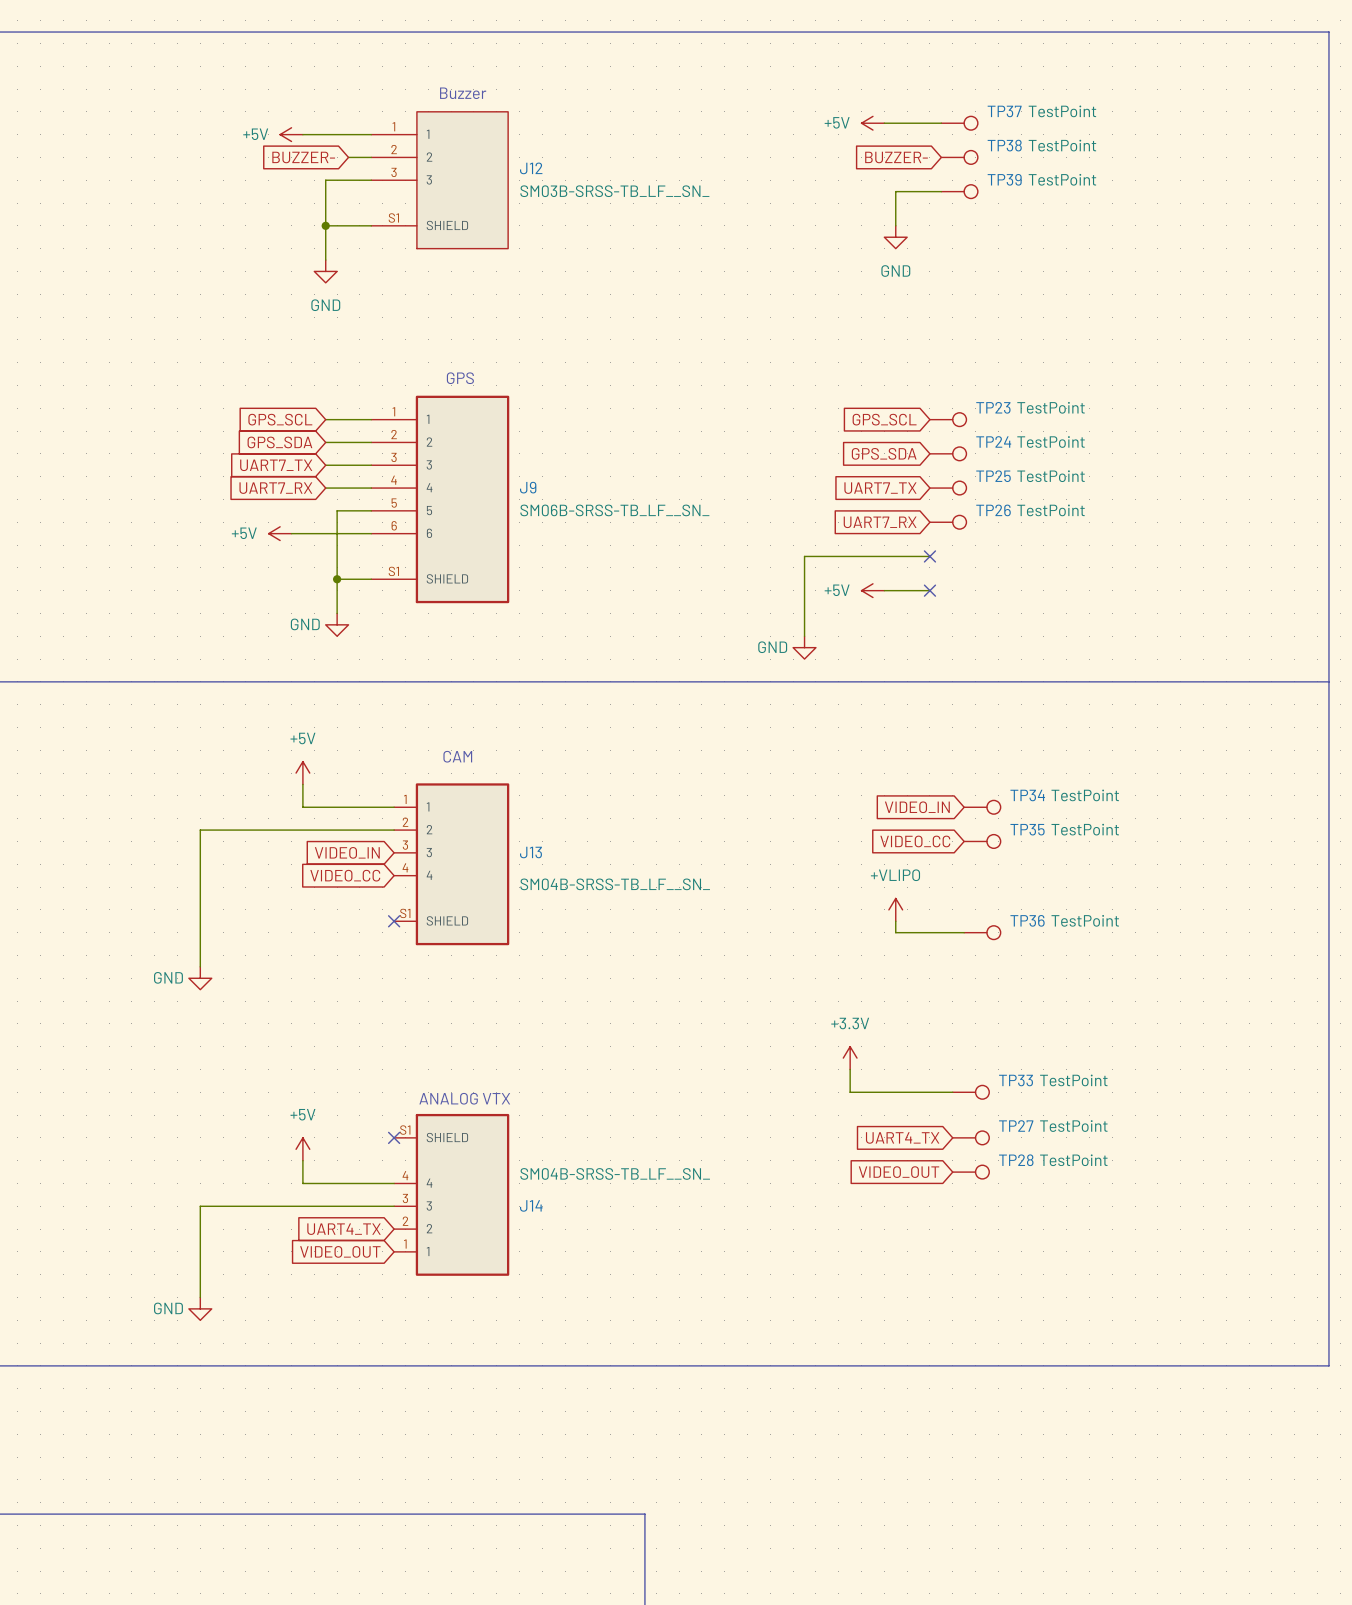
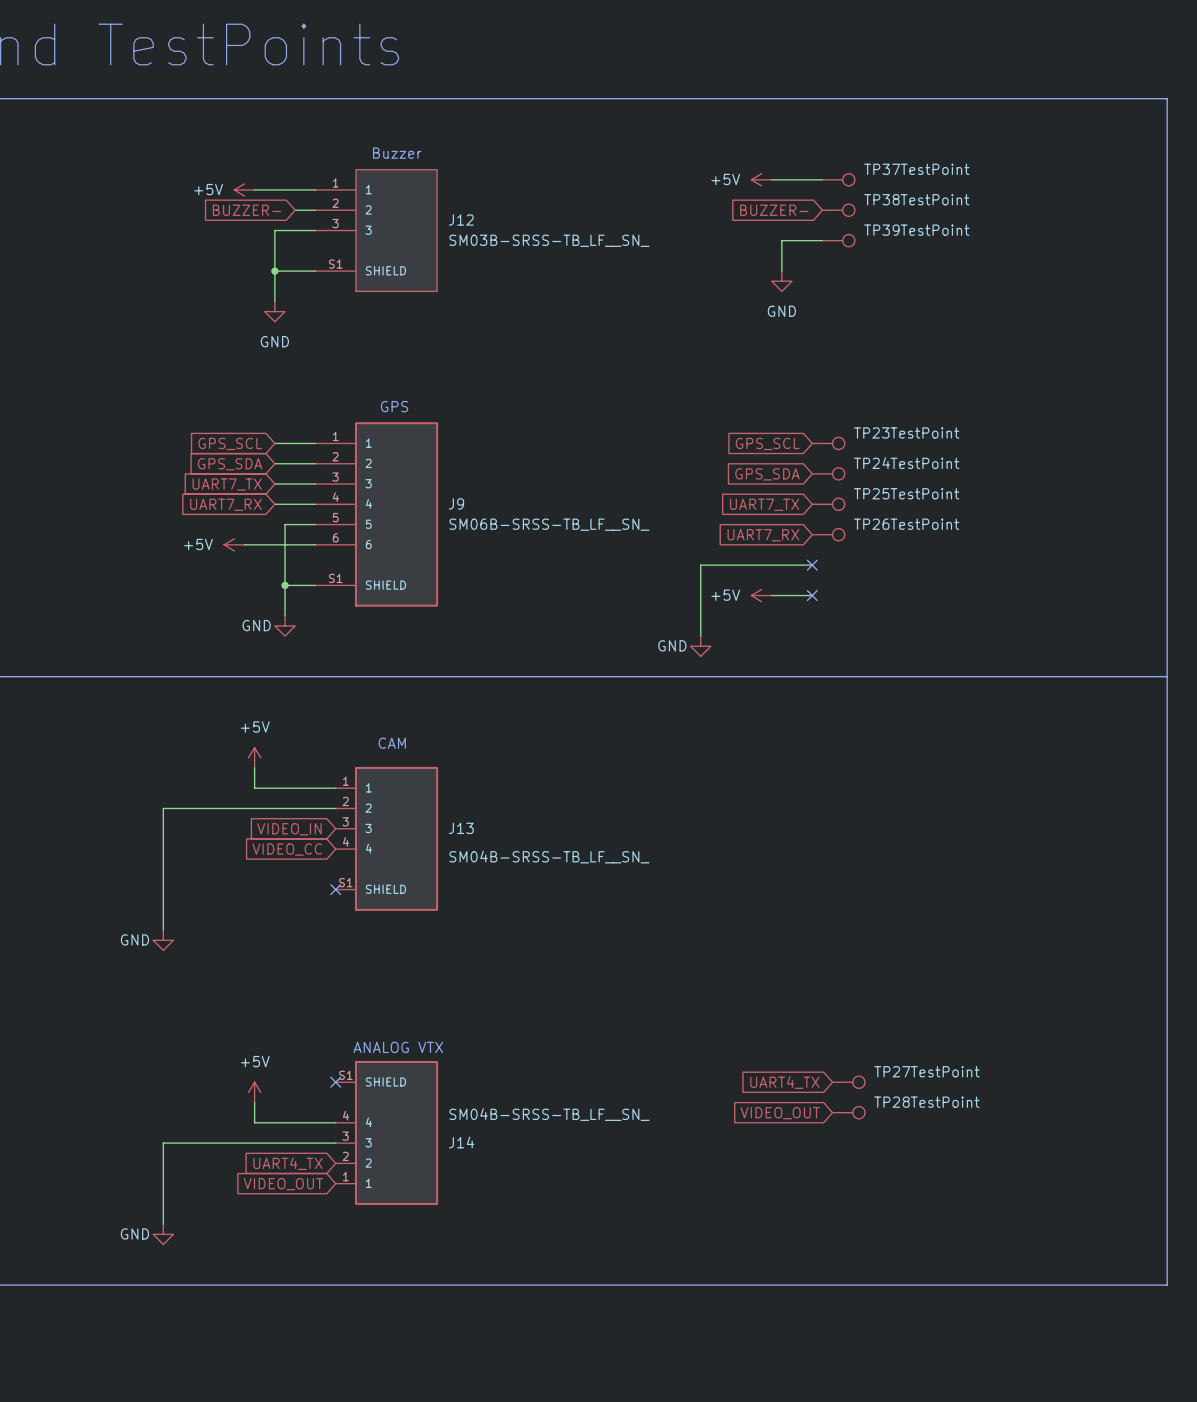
global label: VIDEO_IN (917, 807) -> none
TP34: TestPoint (982, 807) -> none
global label: VIDEO_CC (915, 841) -> none
TP35: TestPoint (982, 841) -> none
power symbol: +VLIPO (895, 909) -> none
wire: (895, 921) (895, 932) (964, 932) -> none
TP36: TestPoint (982, 932) -> none
power symbol: +3.3V (850, 1058) -> none
wire: (850, 1069) (850, 1092) (952, 1092) -> none
TP33: TestPoint (970, 1092) -> none

